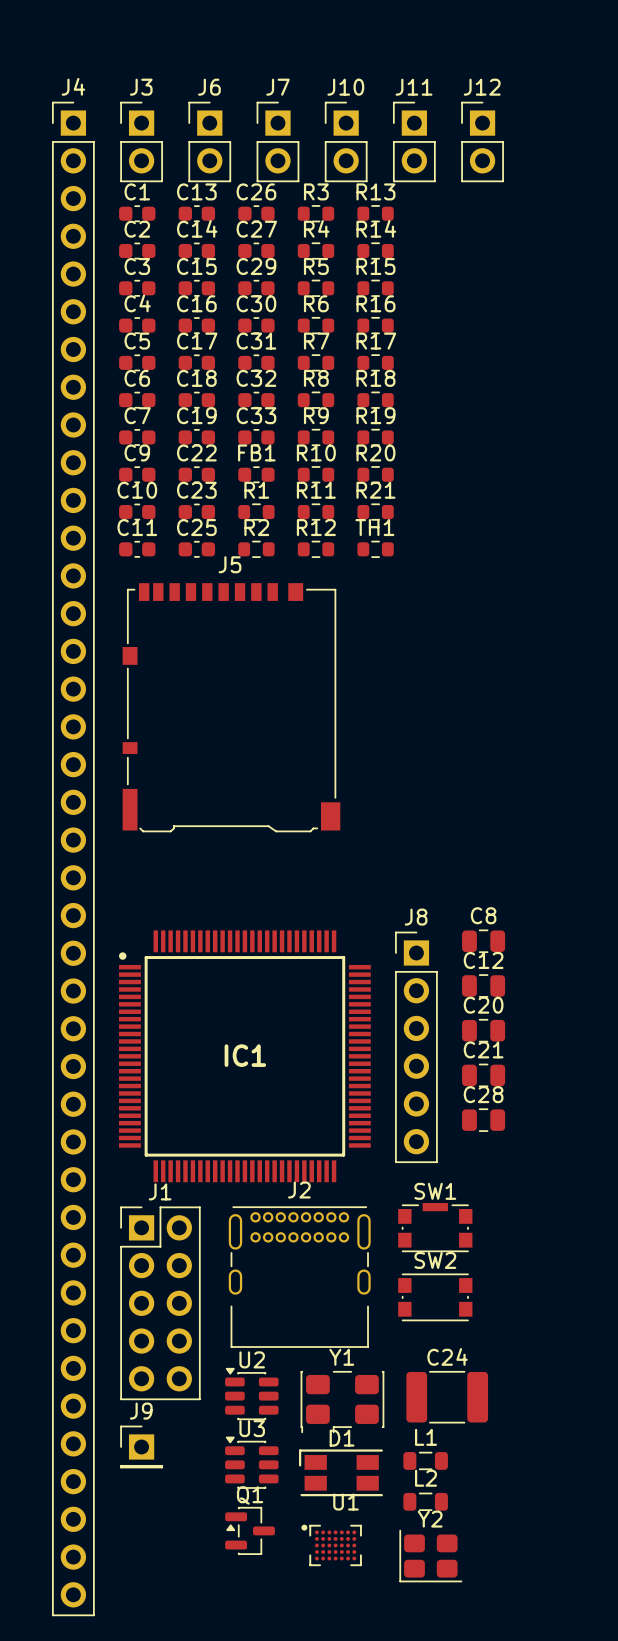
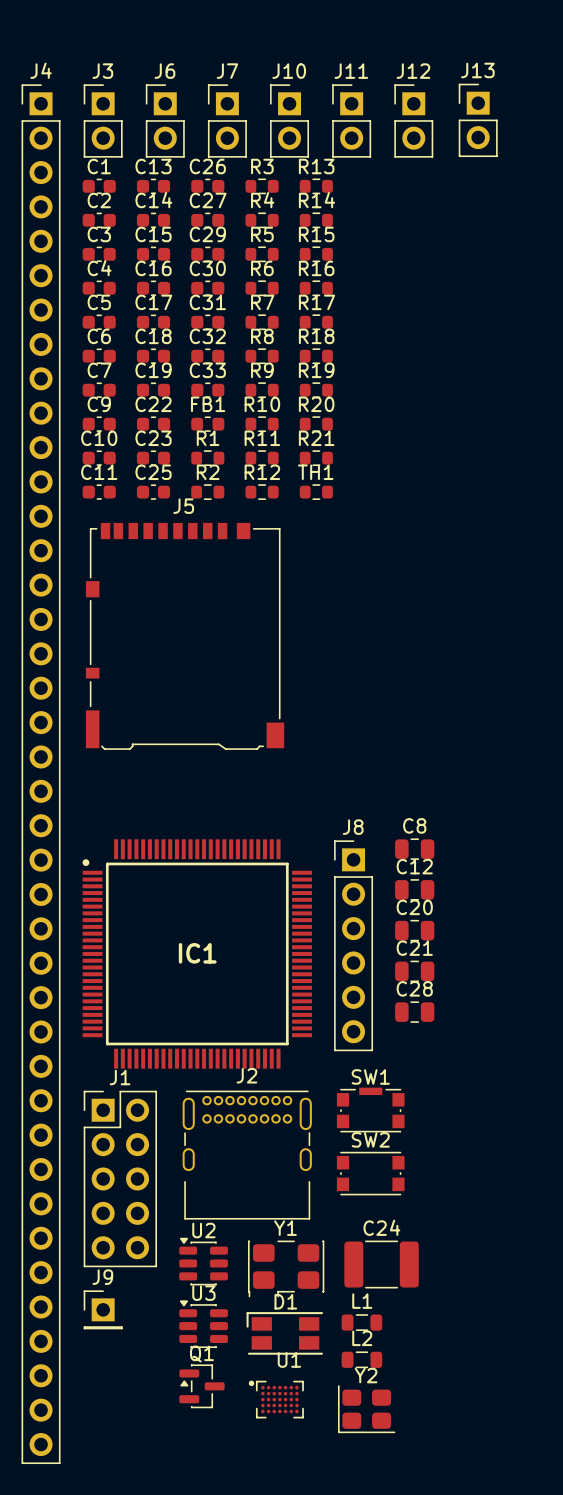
J13: none -> (478, 120)

